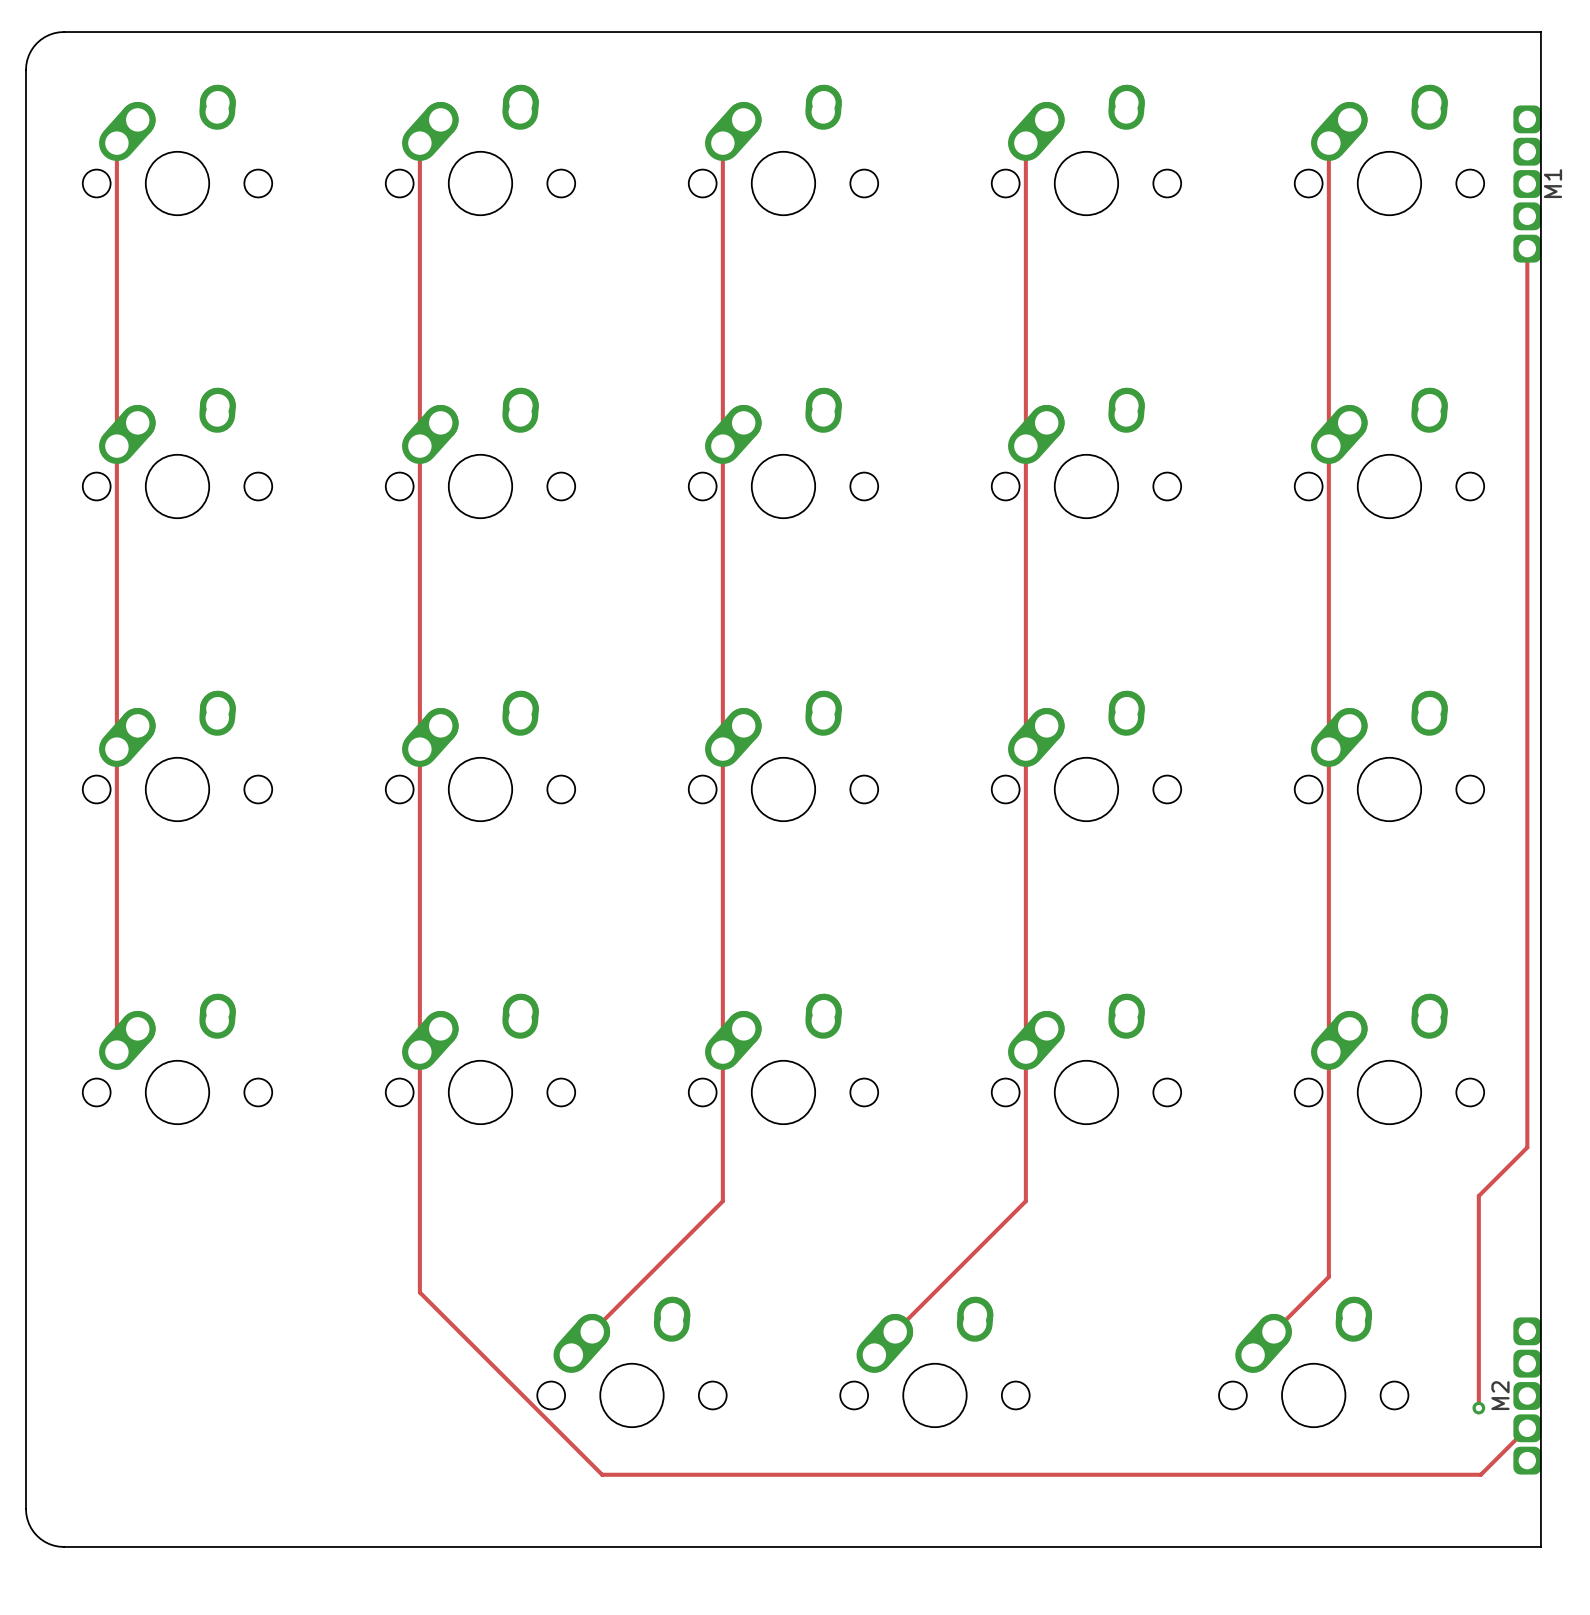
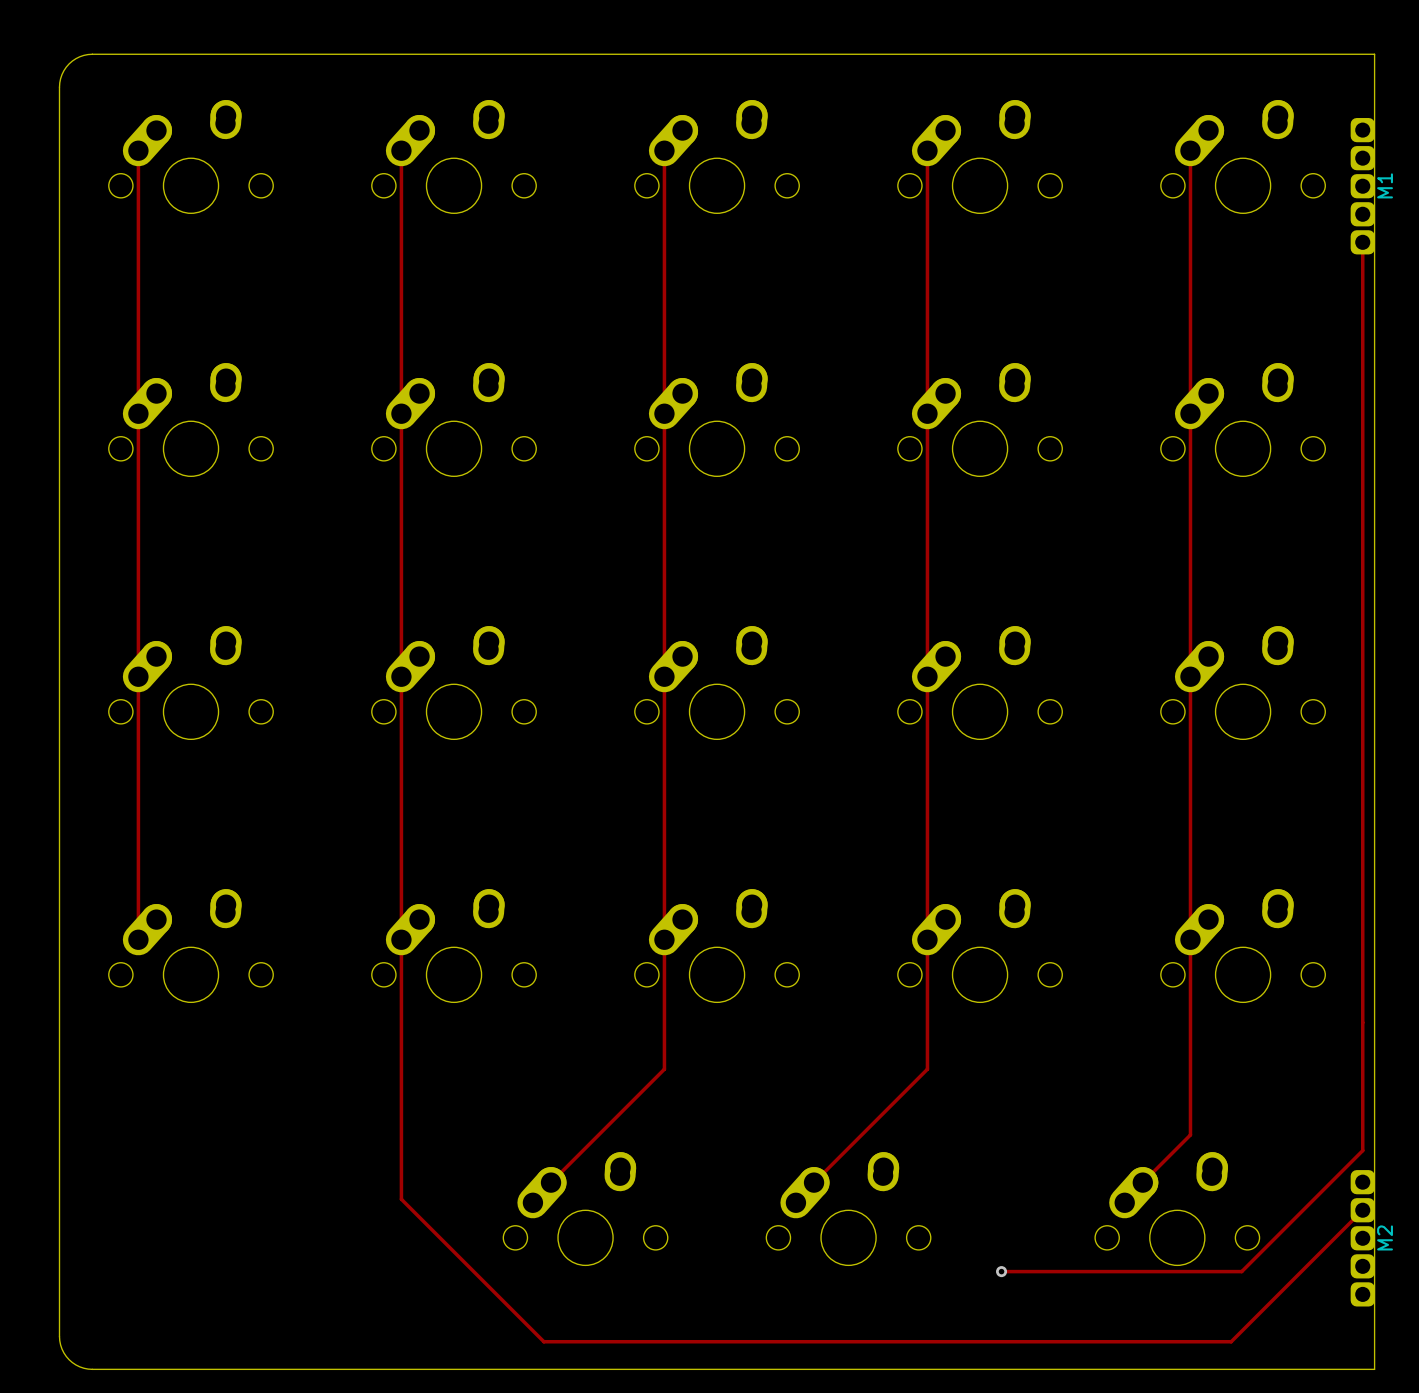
track: (1527, 1147) (1478, 1196) (1478, 1408) -> (1362, 1022) (1362, 1150) (1241, 1271) (1001, 1271)
track: (419, 1292) (602, 1474) (1480, 1474) (1527, 1428) -> (401, 1148) (401, 1199) (543, 1341) (1231, 1341) (1362, 1210)
M2 name position: M2 (1500, 1395) -> M2 (1385, 1237)
via: (1478, 1408) -> none
via: none -> (1001, 1271)

